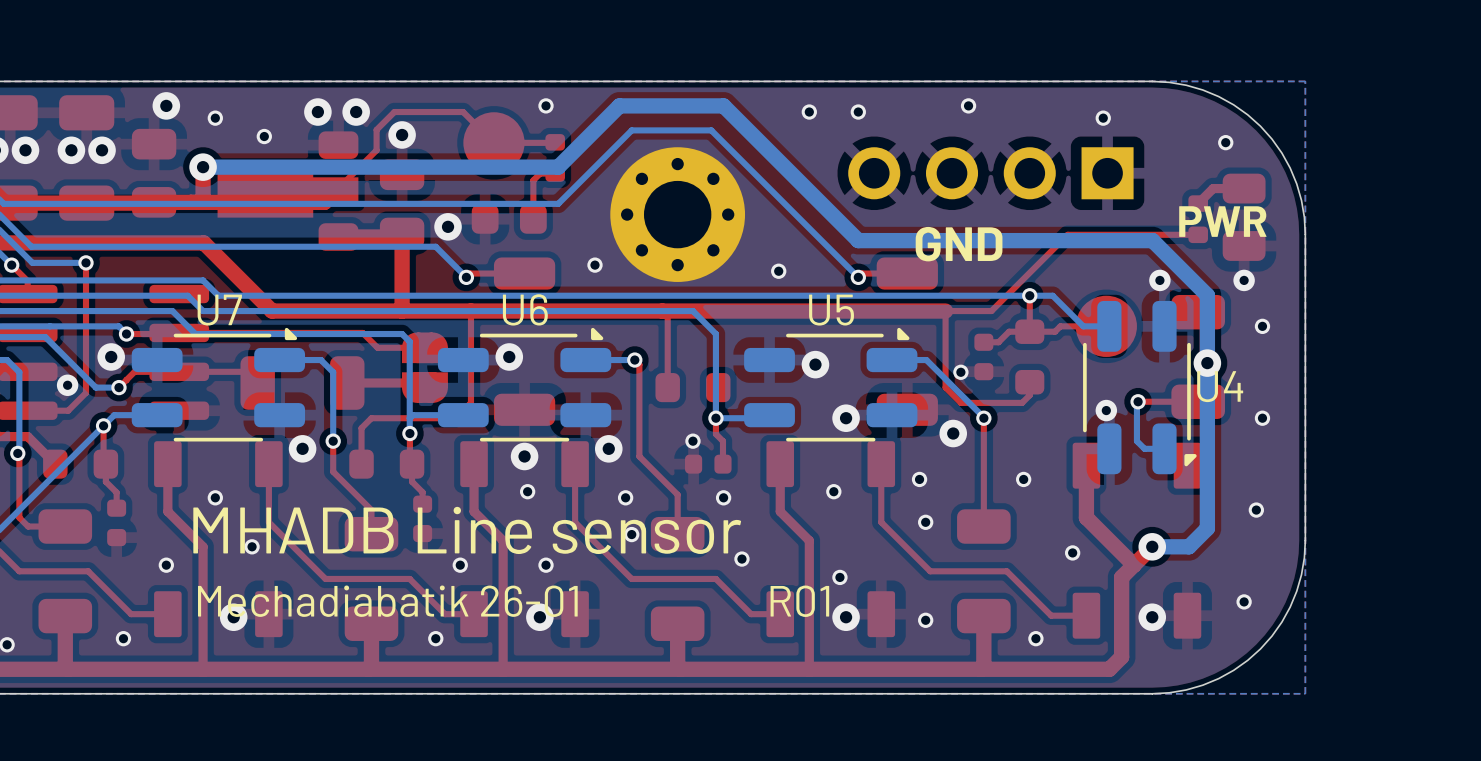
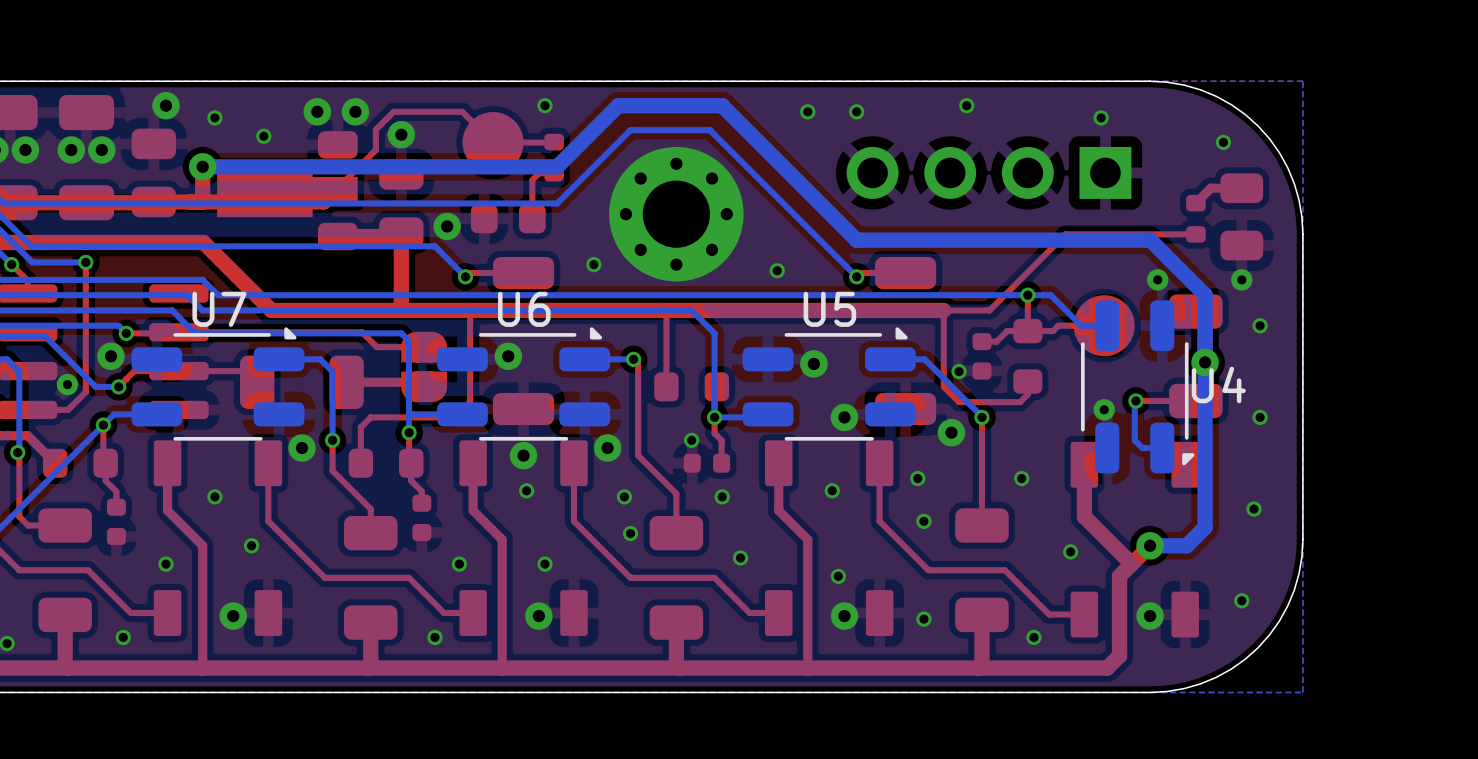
text: PWR (1222, 221) -> none
text: GND (959, 244) -> none
text: MHADB Line sensor (467, 530) -> none
text: Mechadiabatik 26-01 (387, 601) -> none
text: R01 (799, 601) -> none

